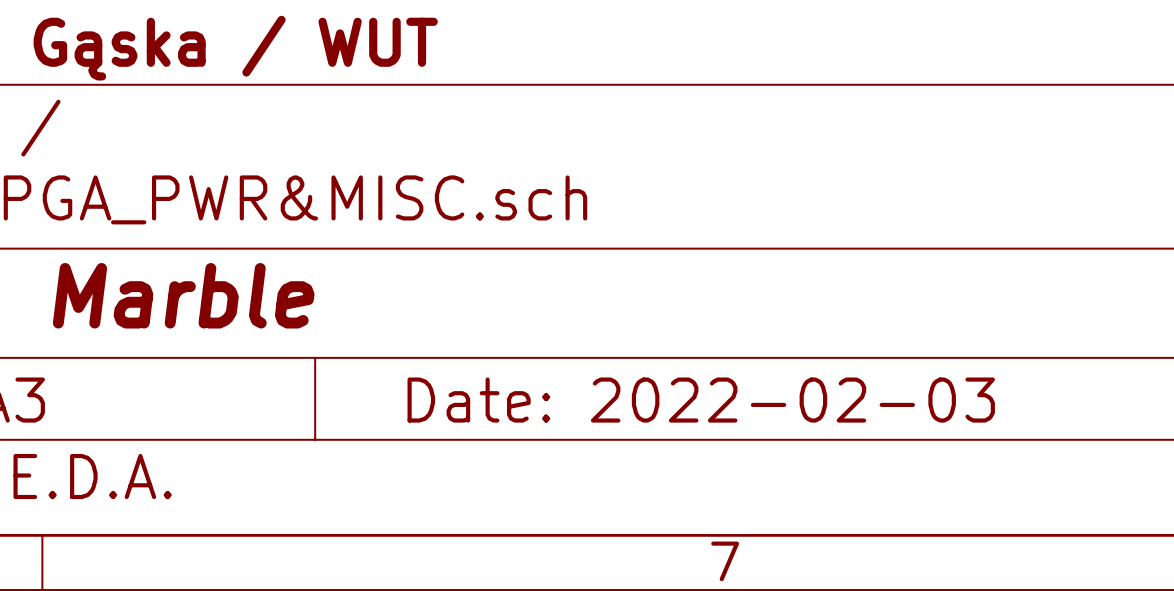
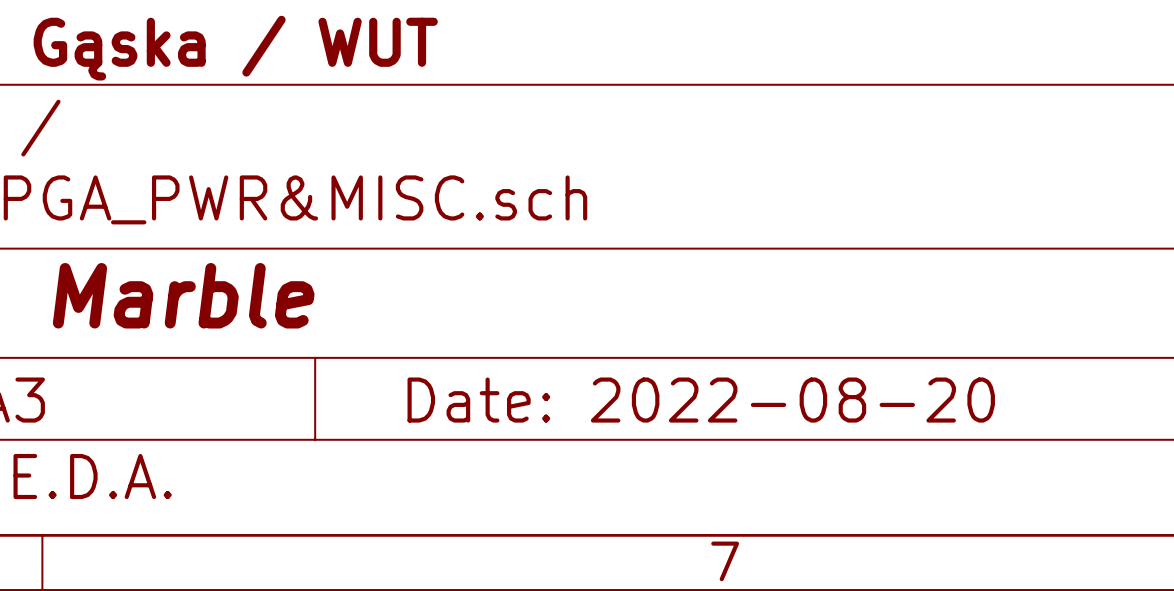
title block: Date: 2022-02-03 (701, 400) -> Date: 2022-08-20 (701, 400)

